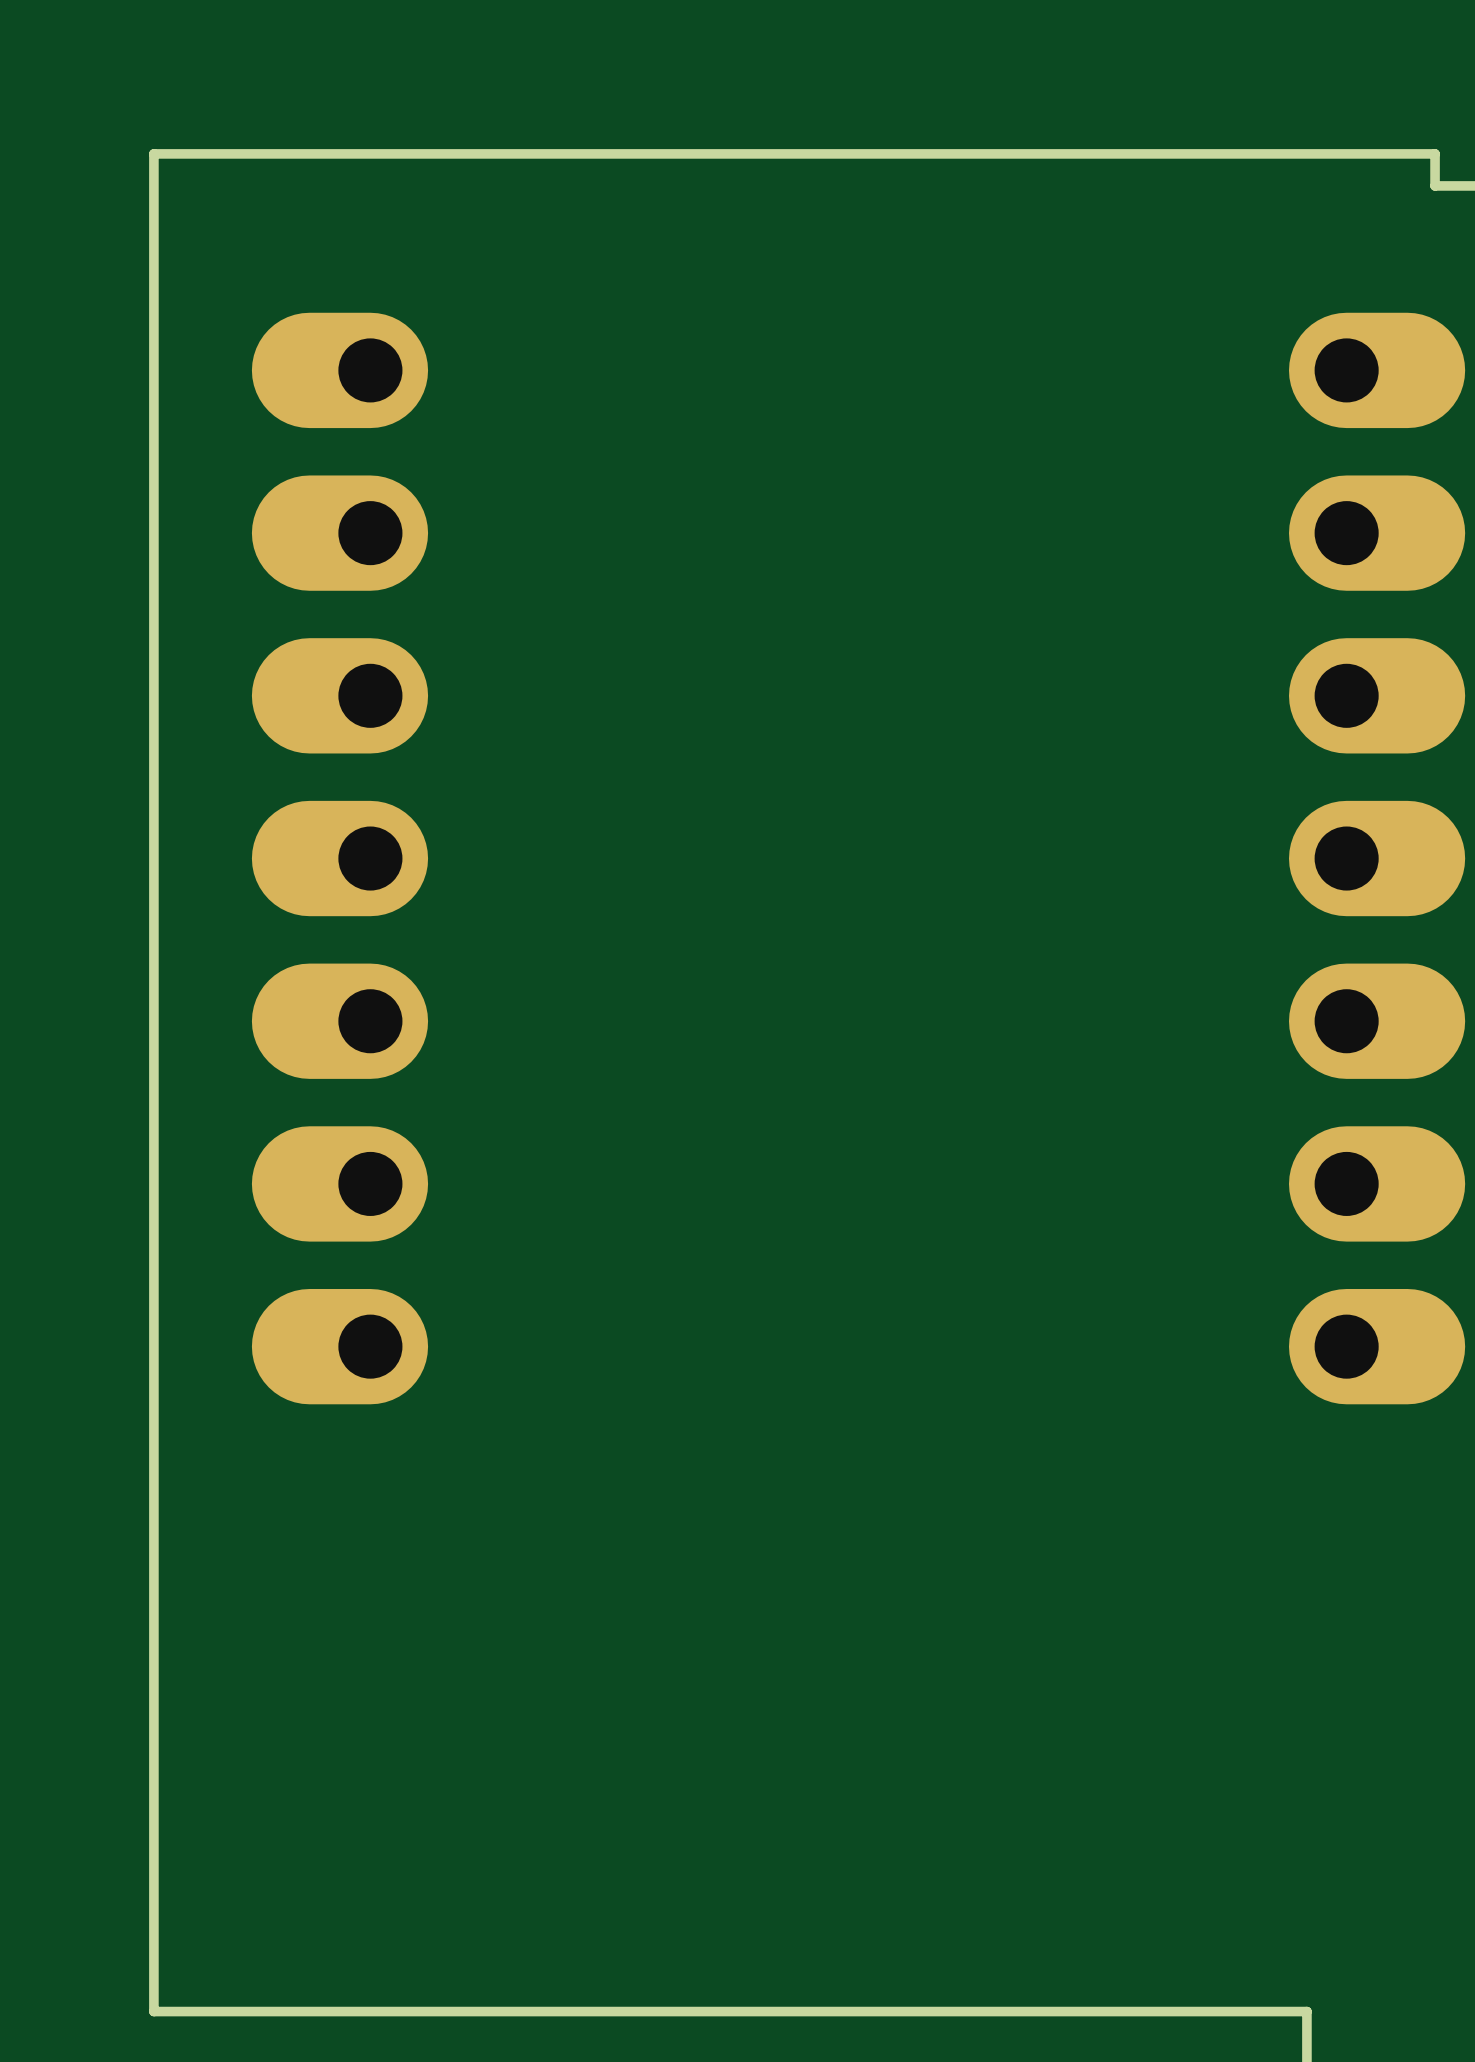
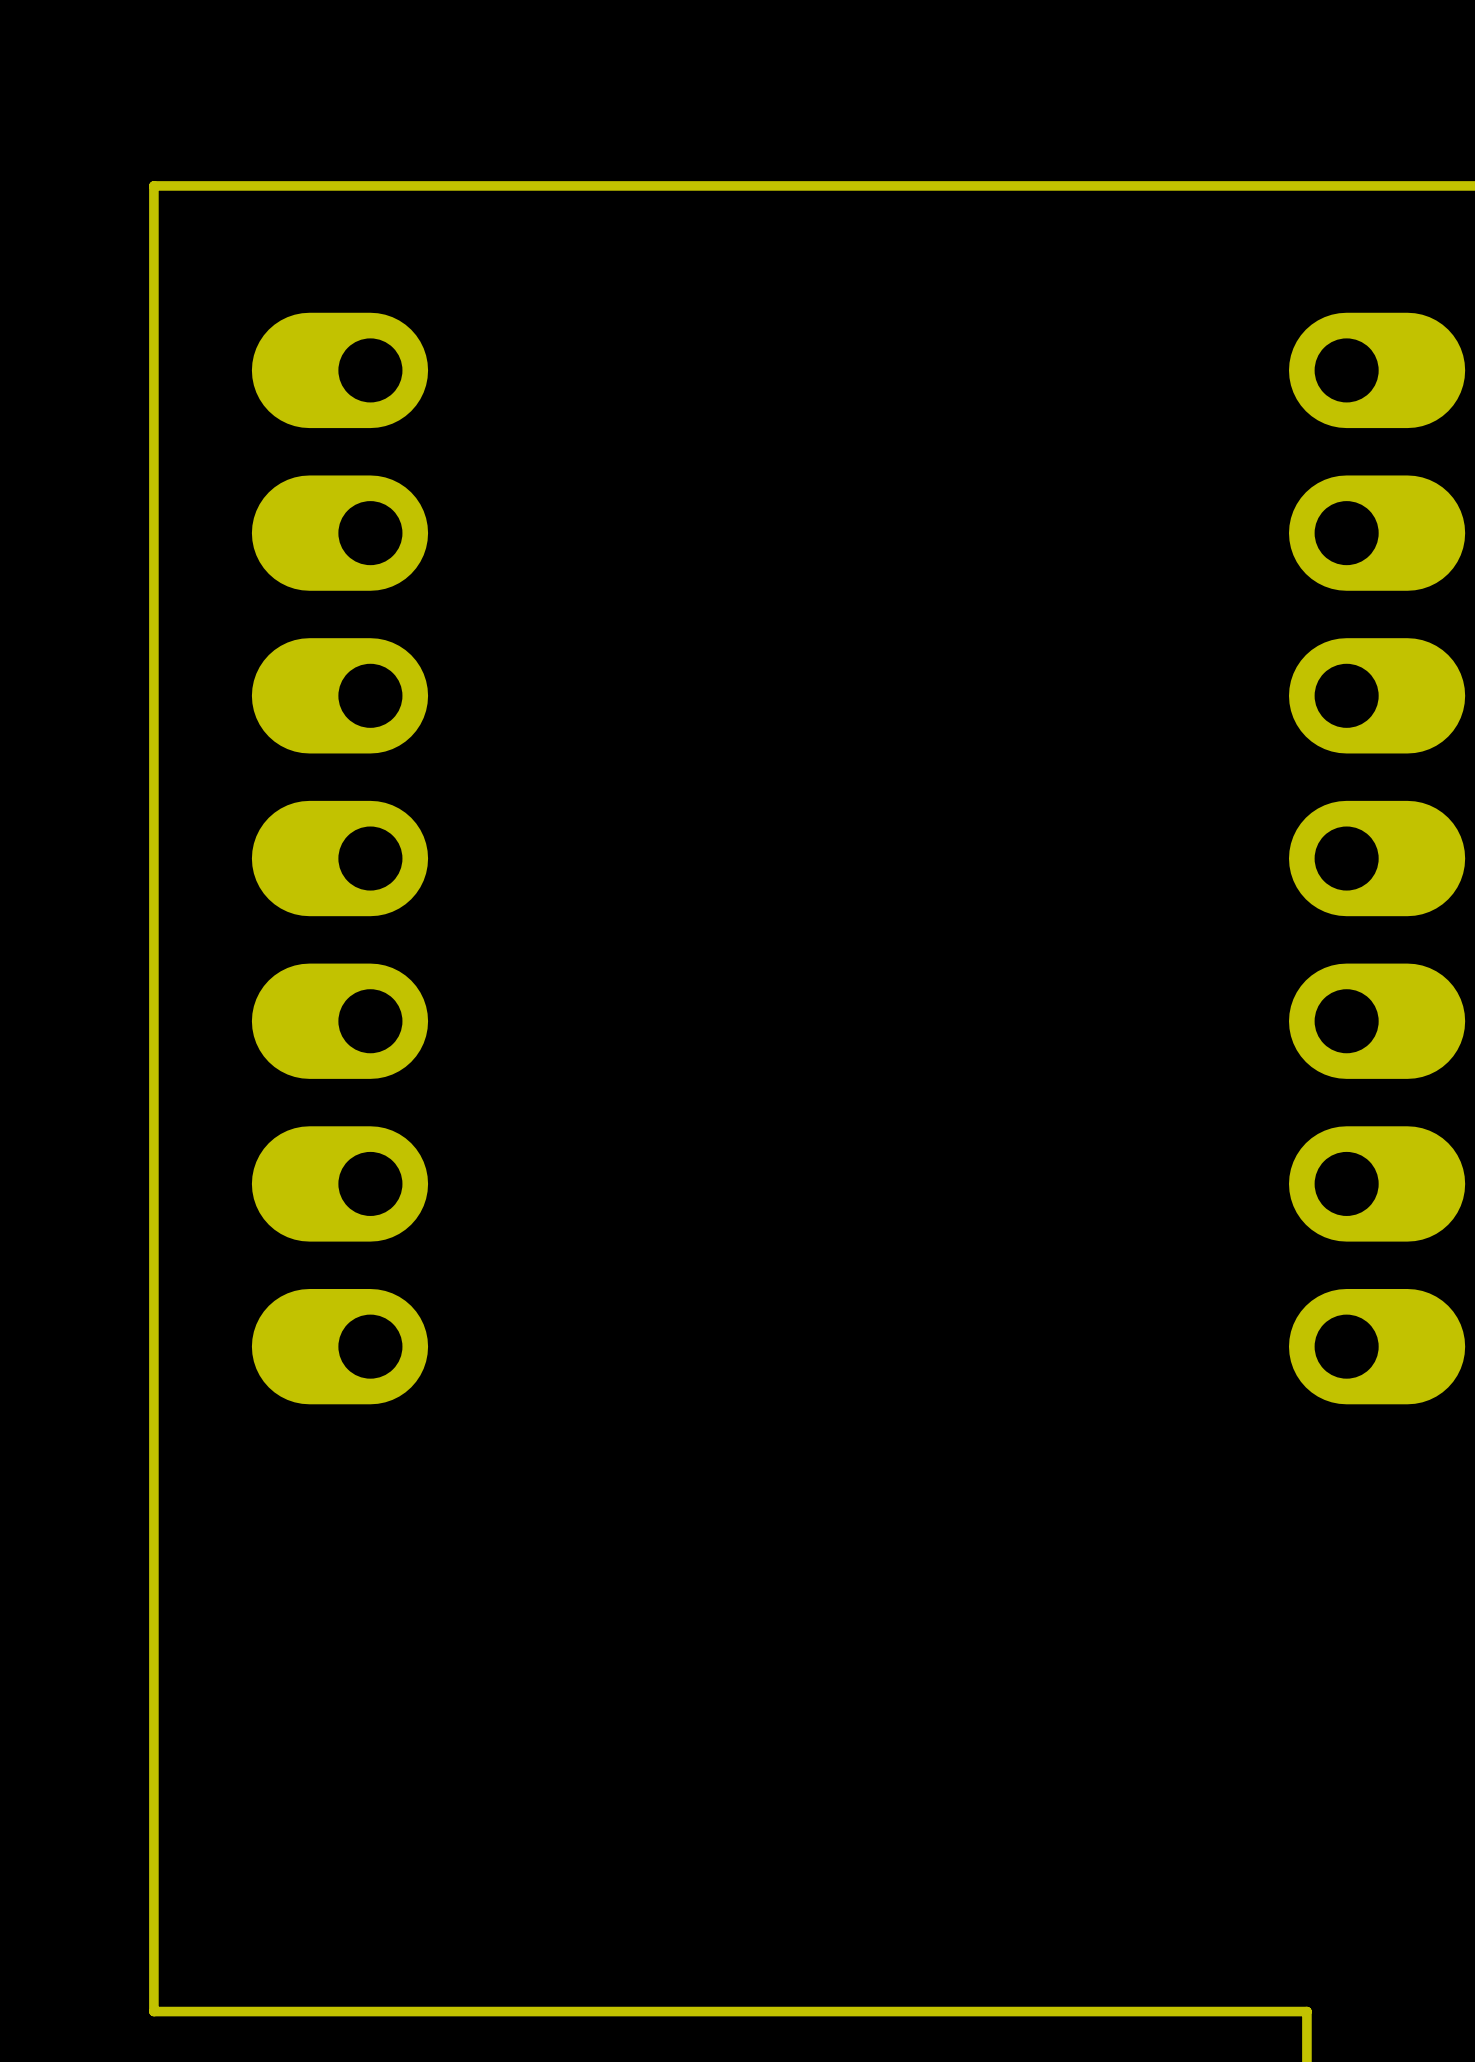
board edge: (1435, 185) (1435, 153) (153, 153) (153, 185) -> (1435, 185) (153, 185)

